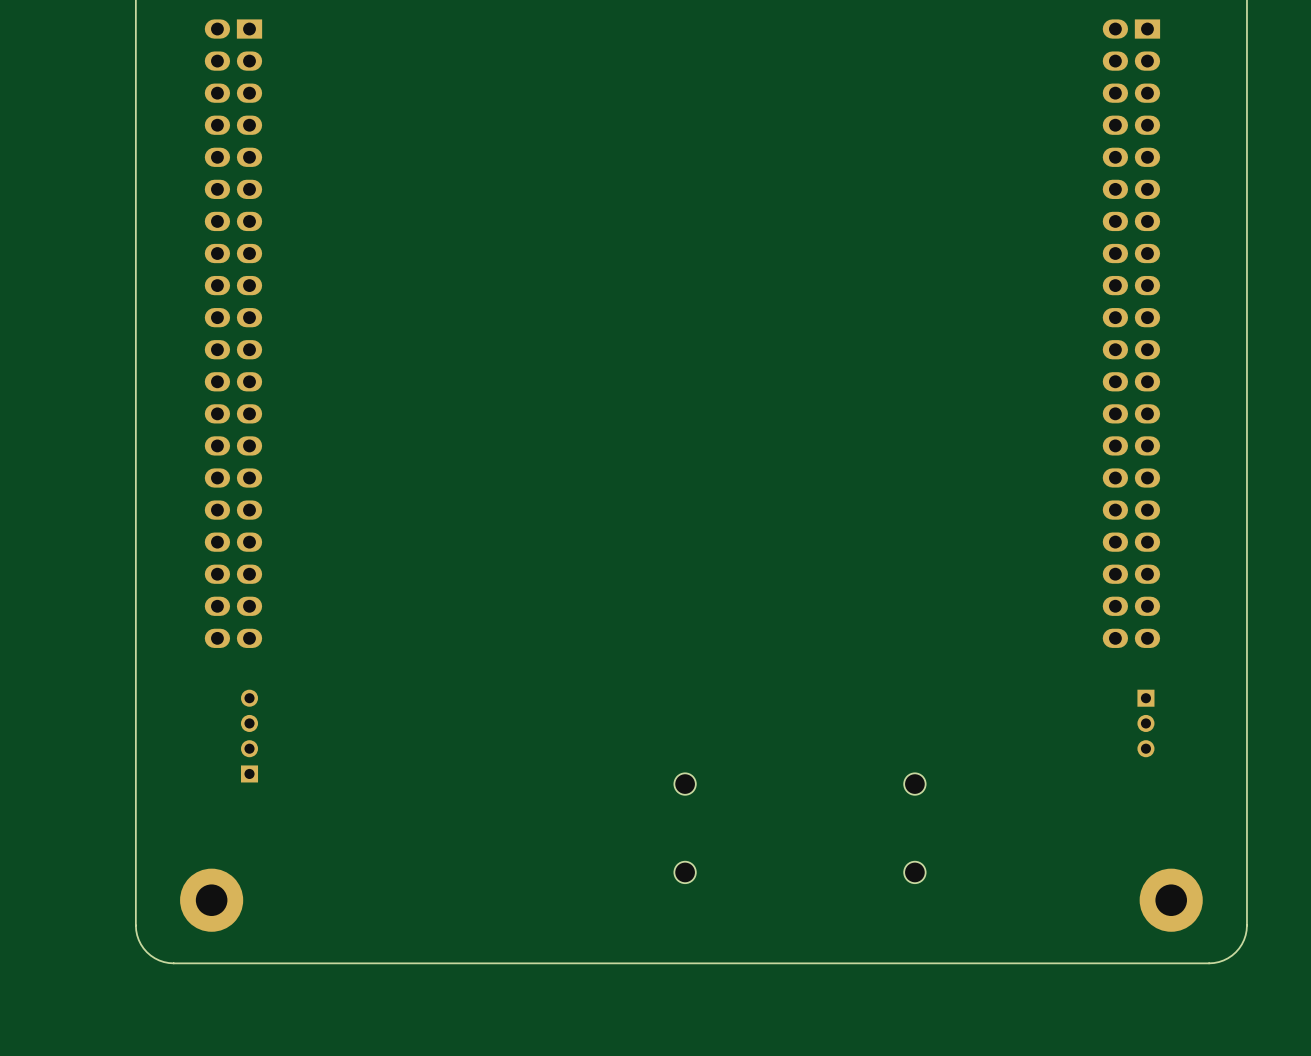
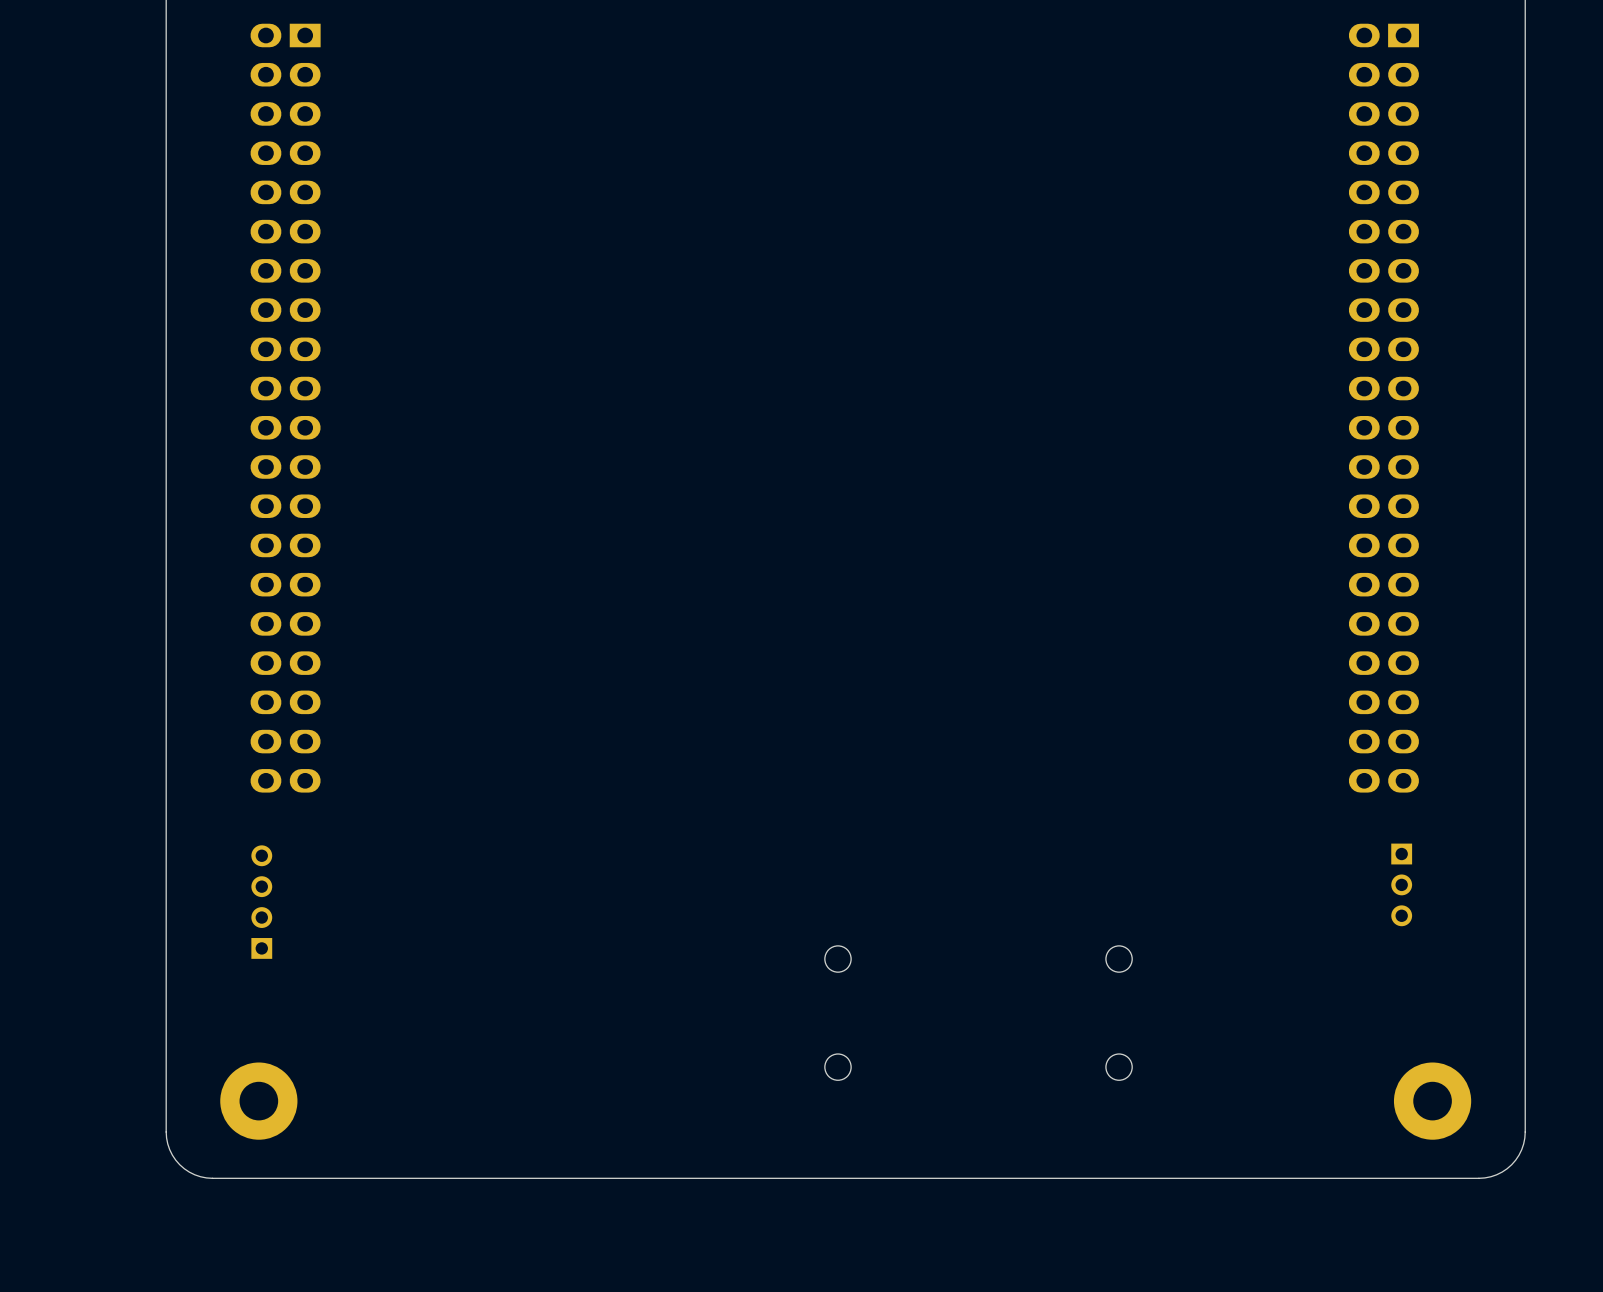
part position: (249, 736) -> (261, 902)

